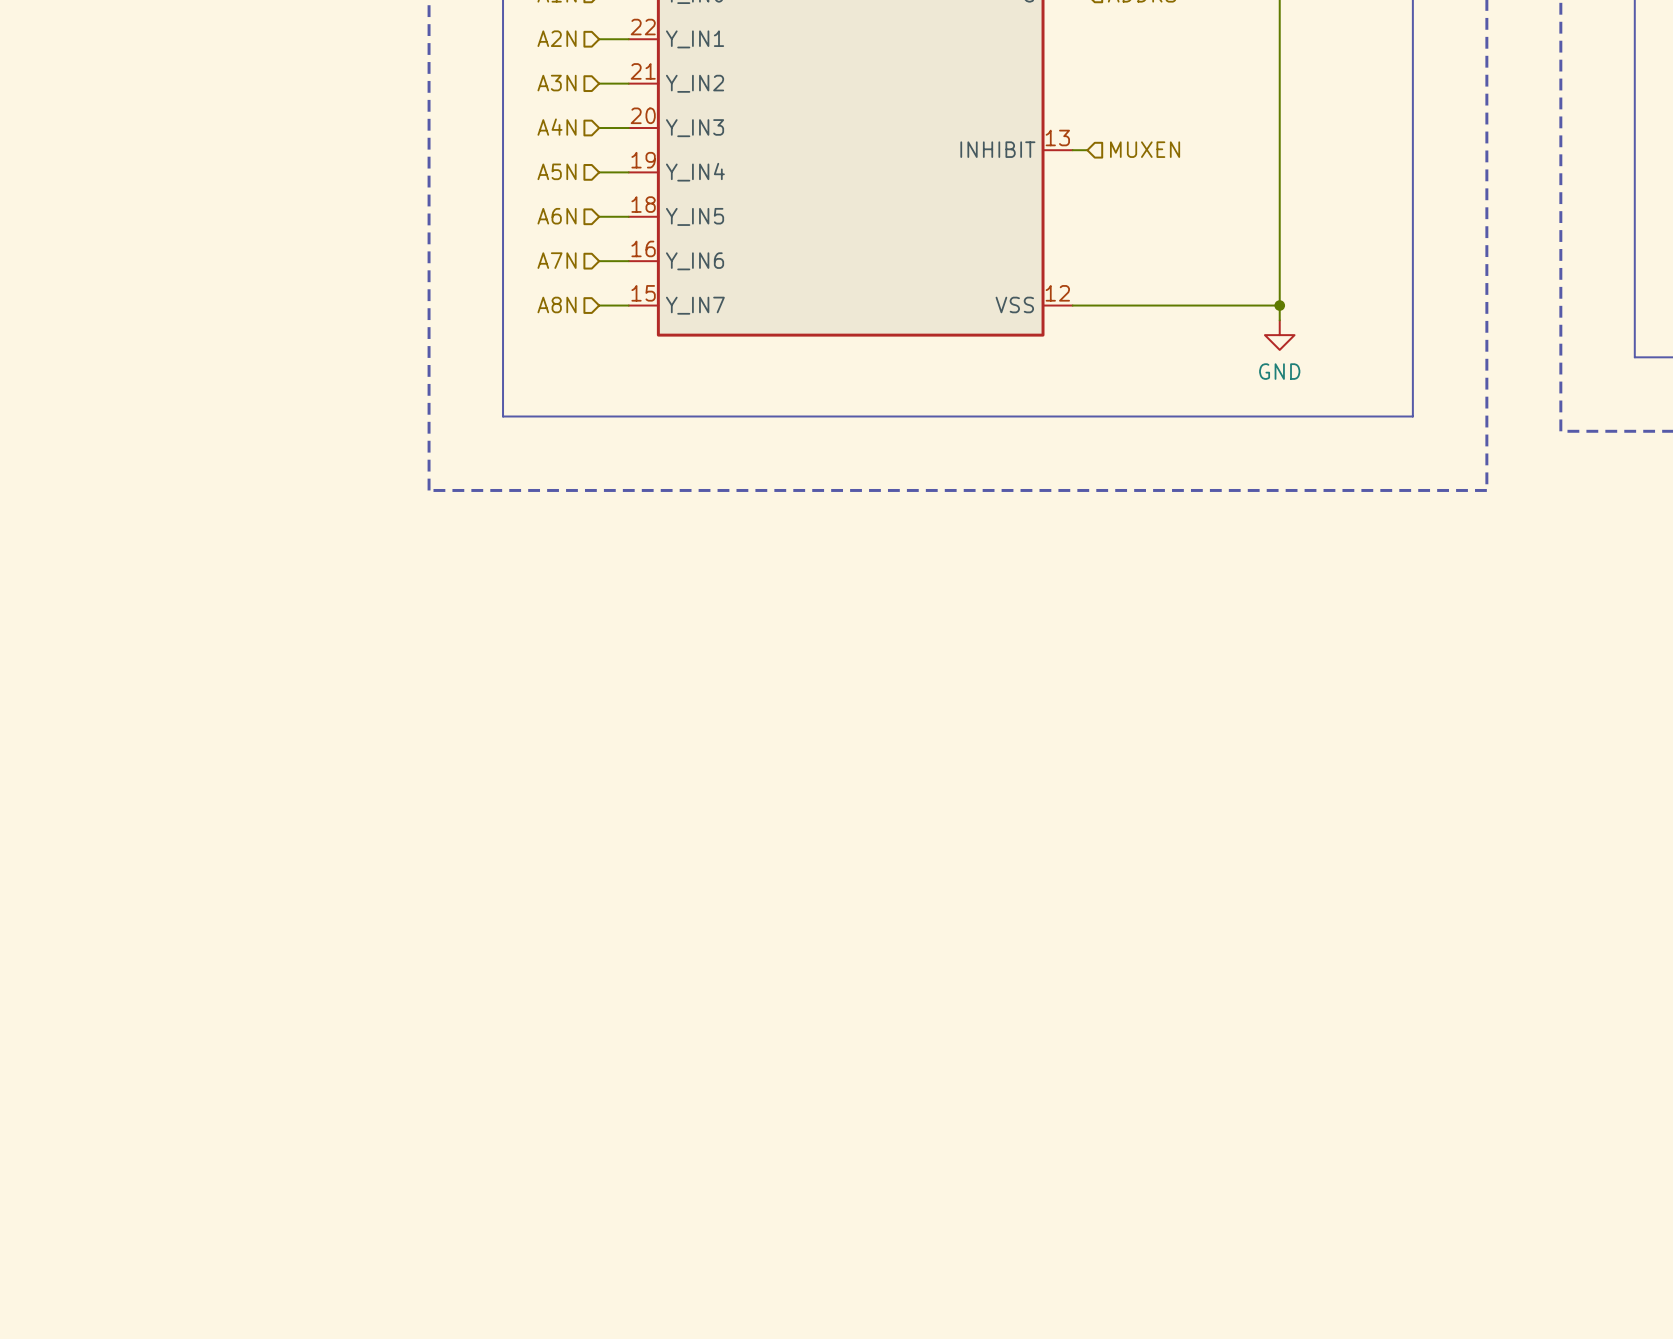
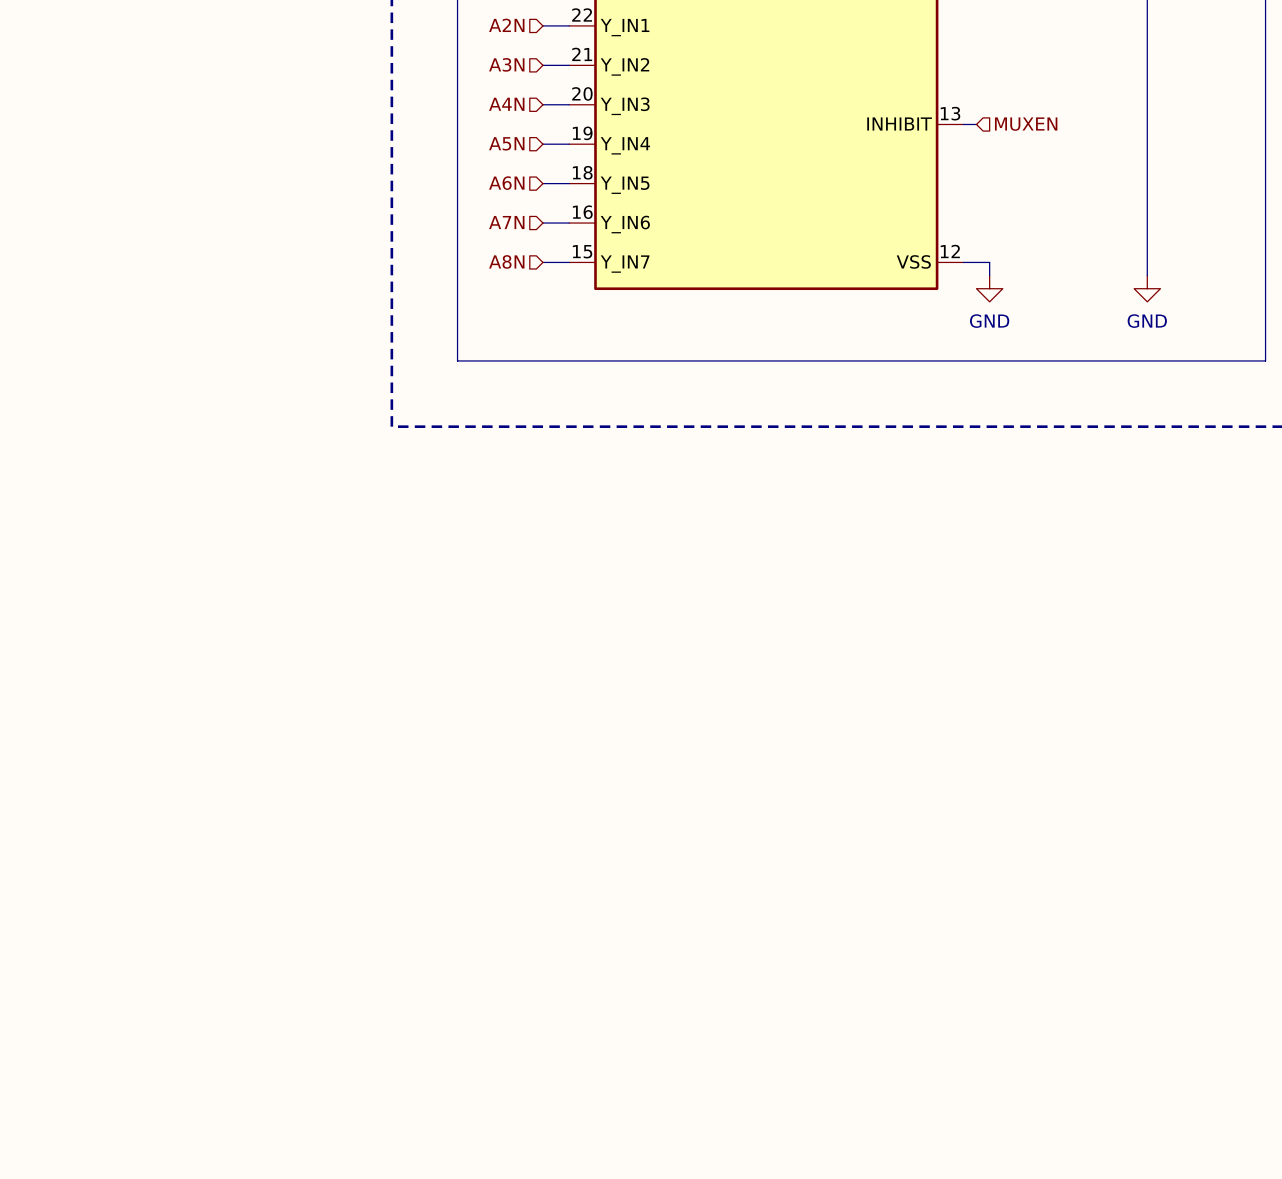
wire: (1102, 305) (1279, 305) -> (989, 262) (989, 275)
junction: (1279, 305) -> none
power symbol: none -> GND (989, 288)

